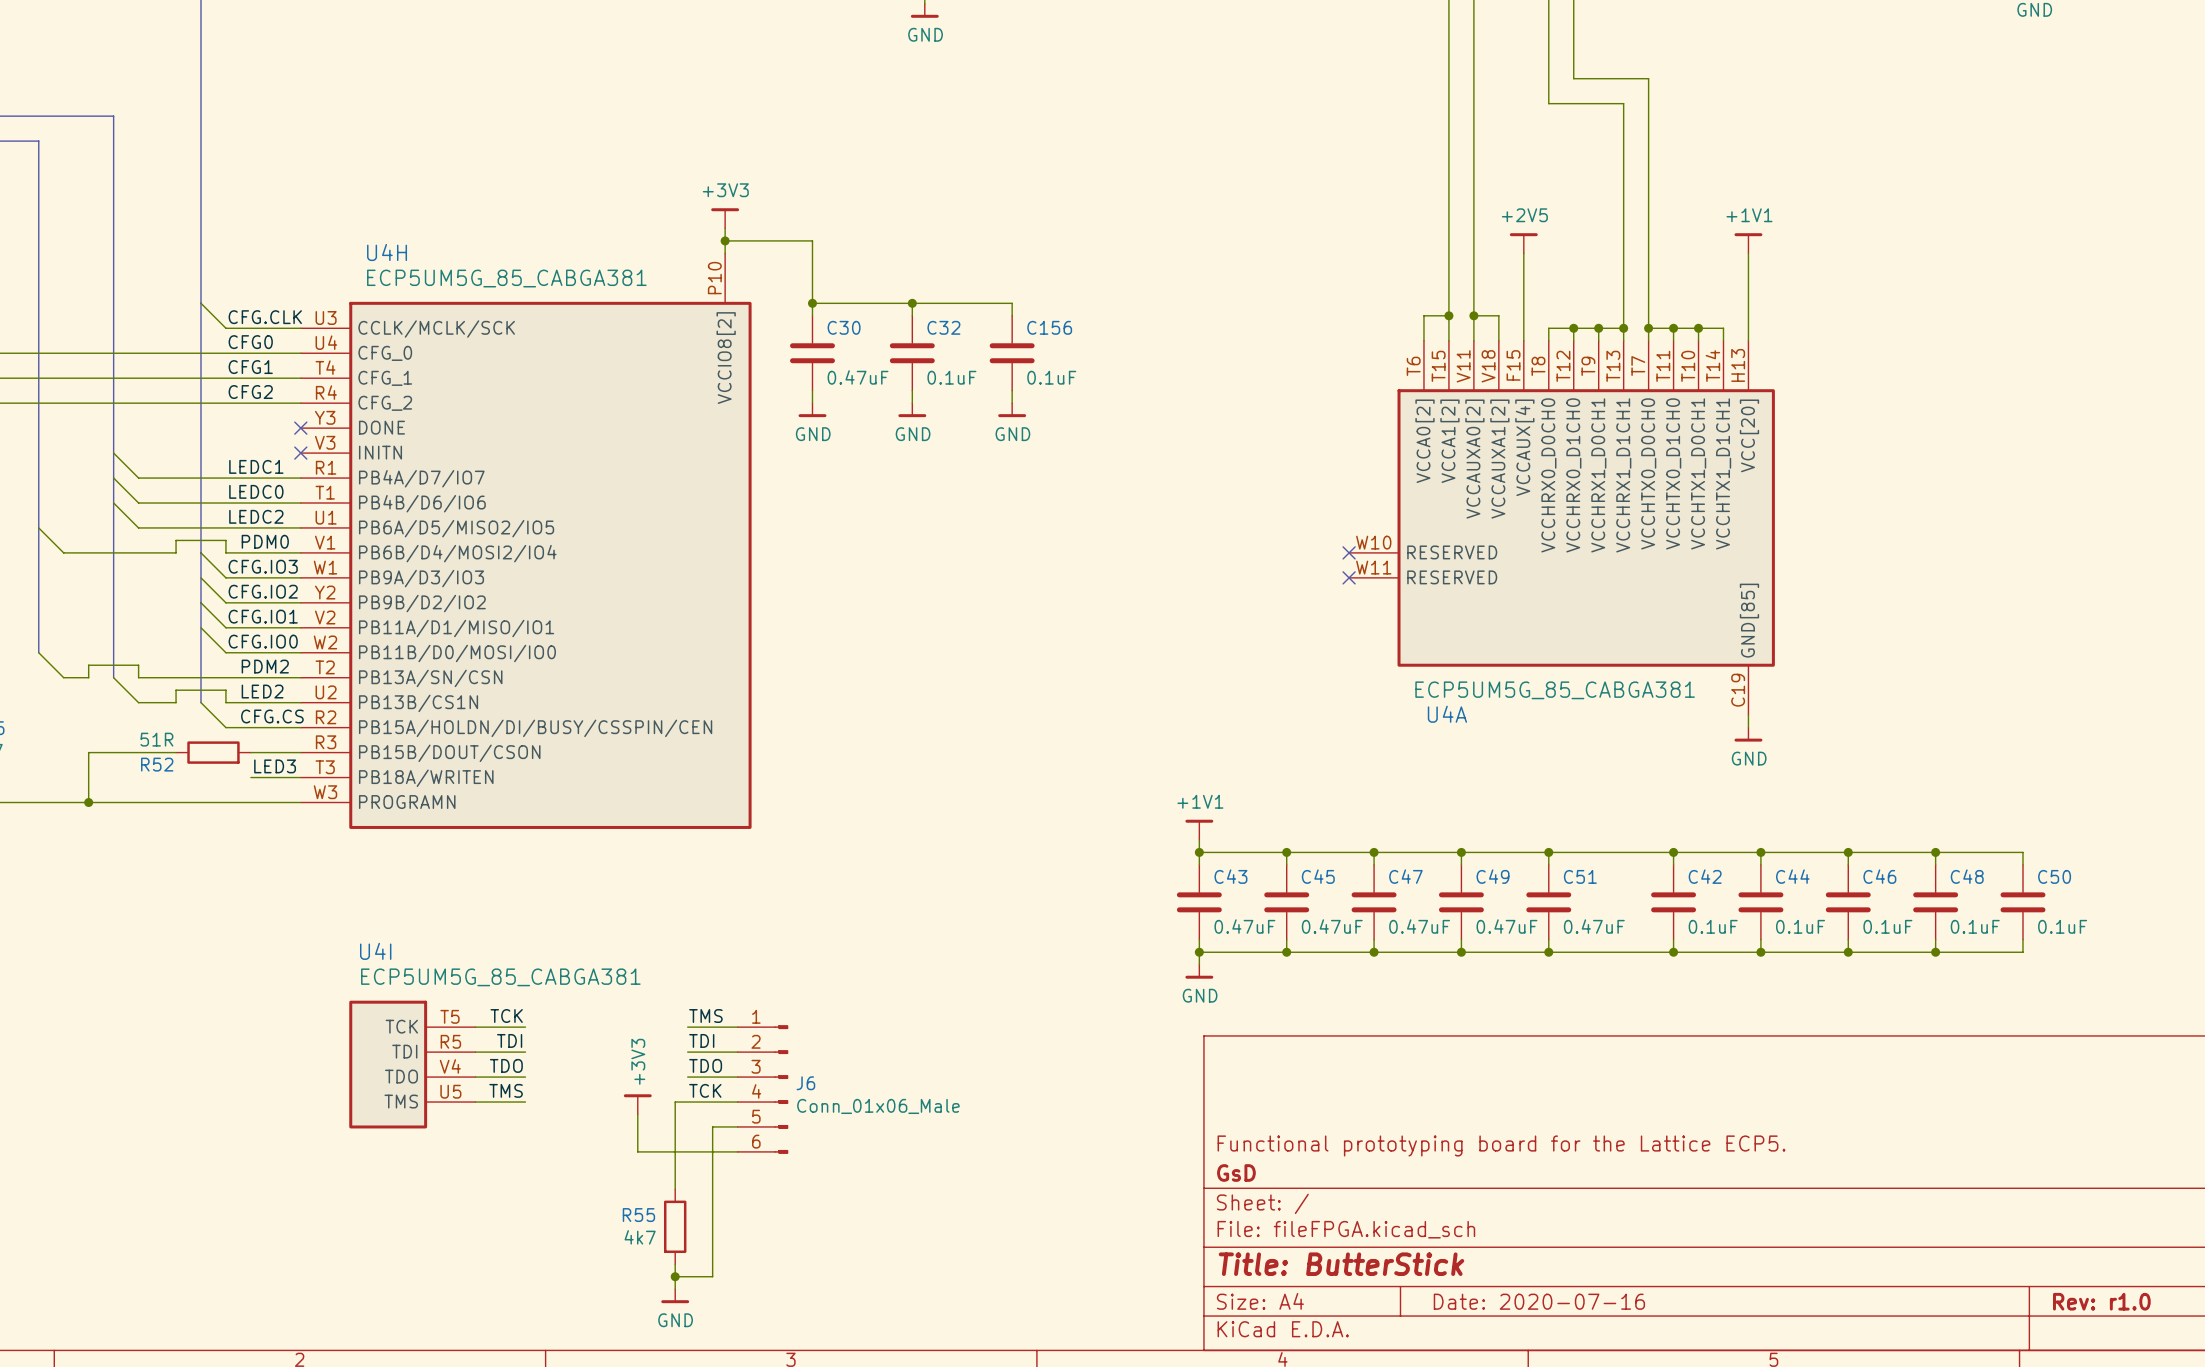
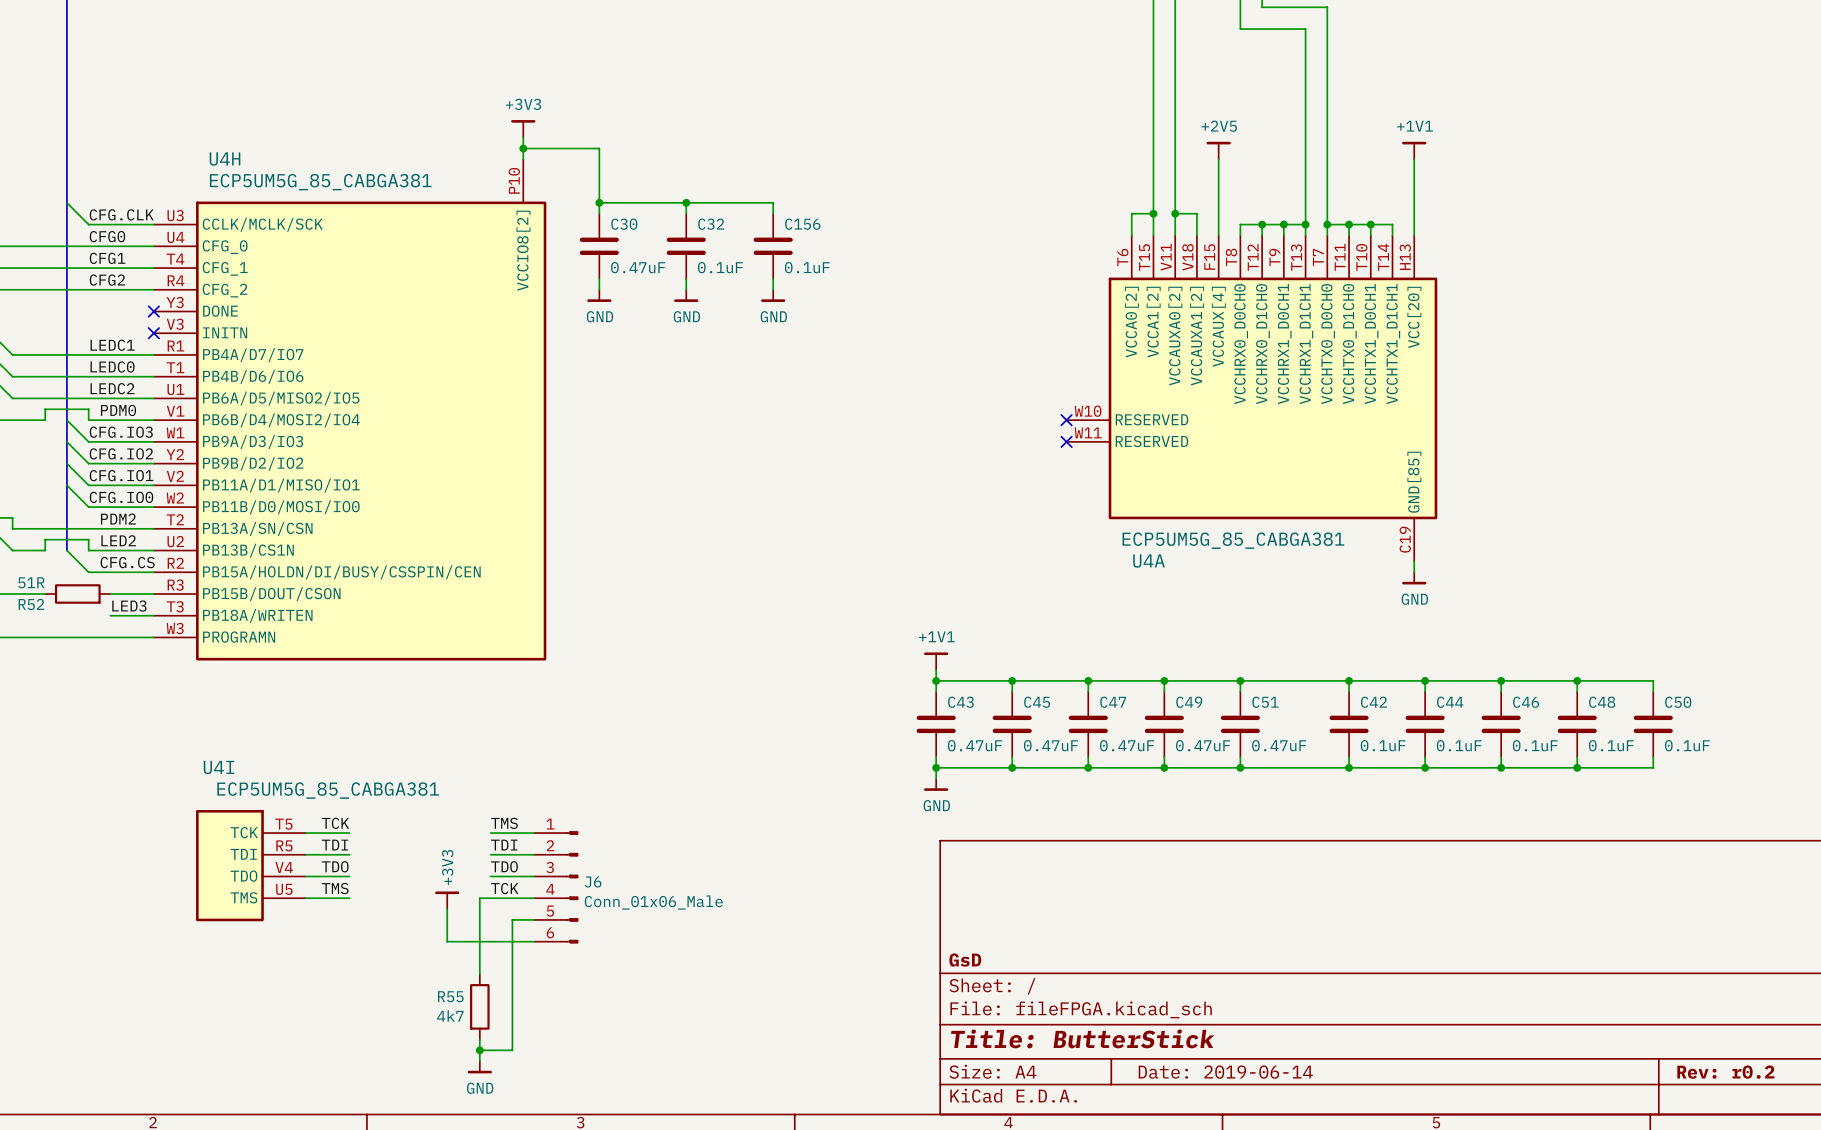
title block: Functional prototyping board for the Lattice ECP5. (1501, 1145) -> none
title block: Date: 2020-07-16 (1539, 1301) -> Date: 2019-06-14 (1225, 1072)
title block: Rev: r1.0 (2101, 1301) -> Rev: r0.2 (1725, 1072)

